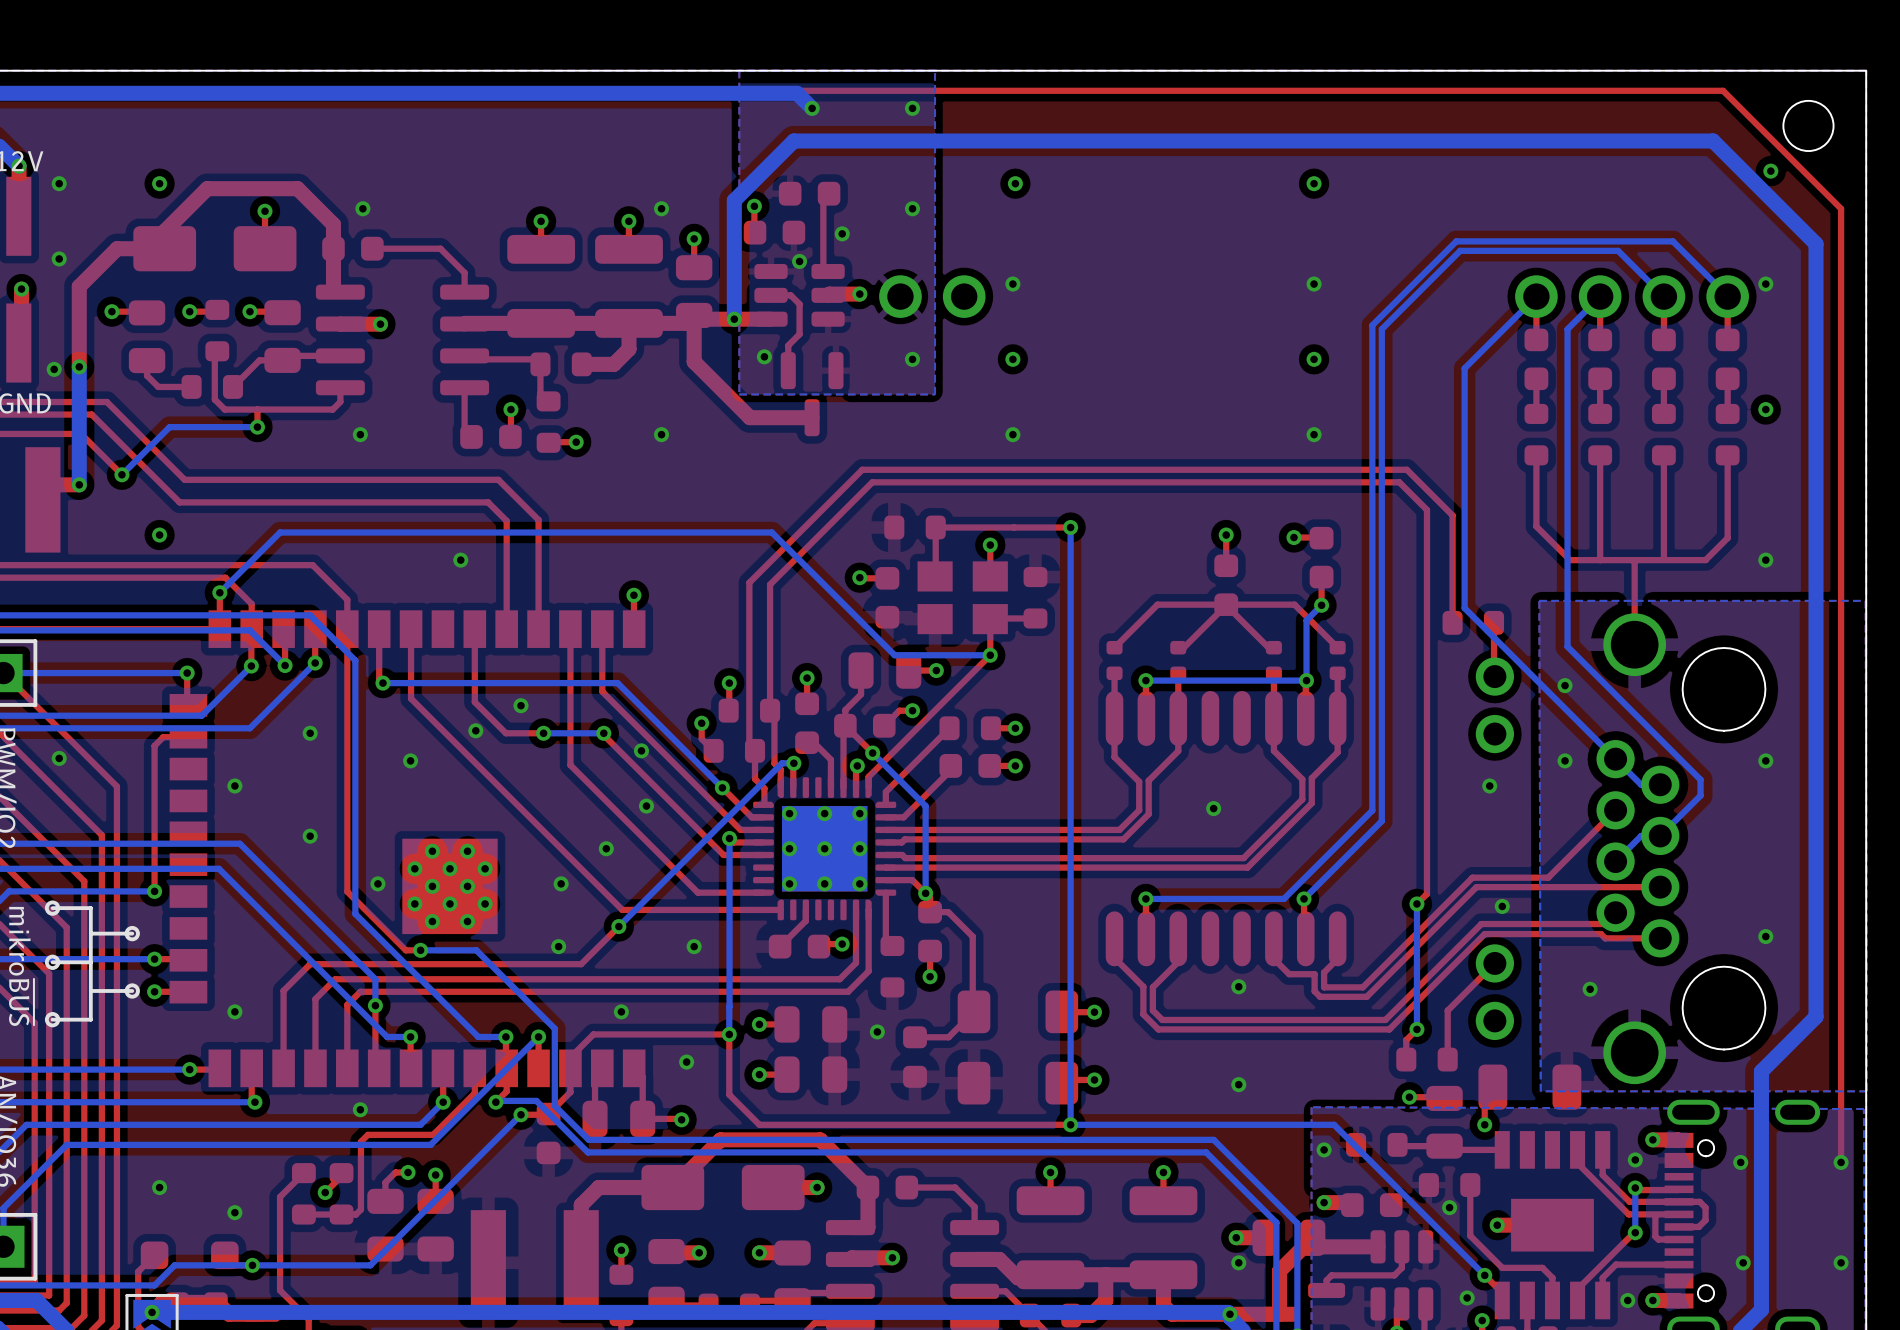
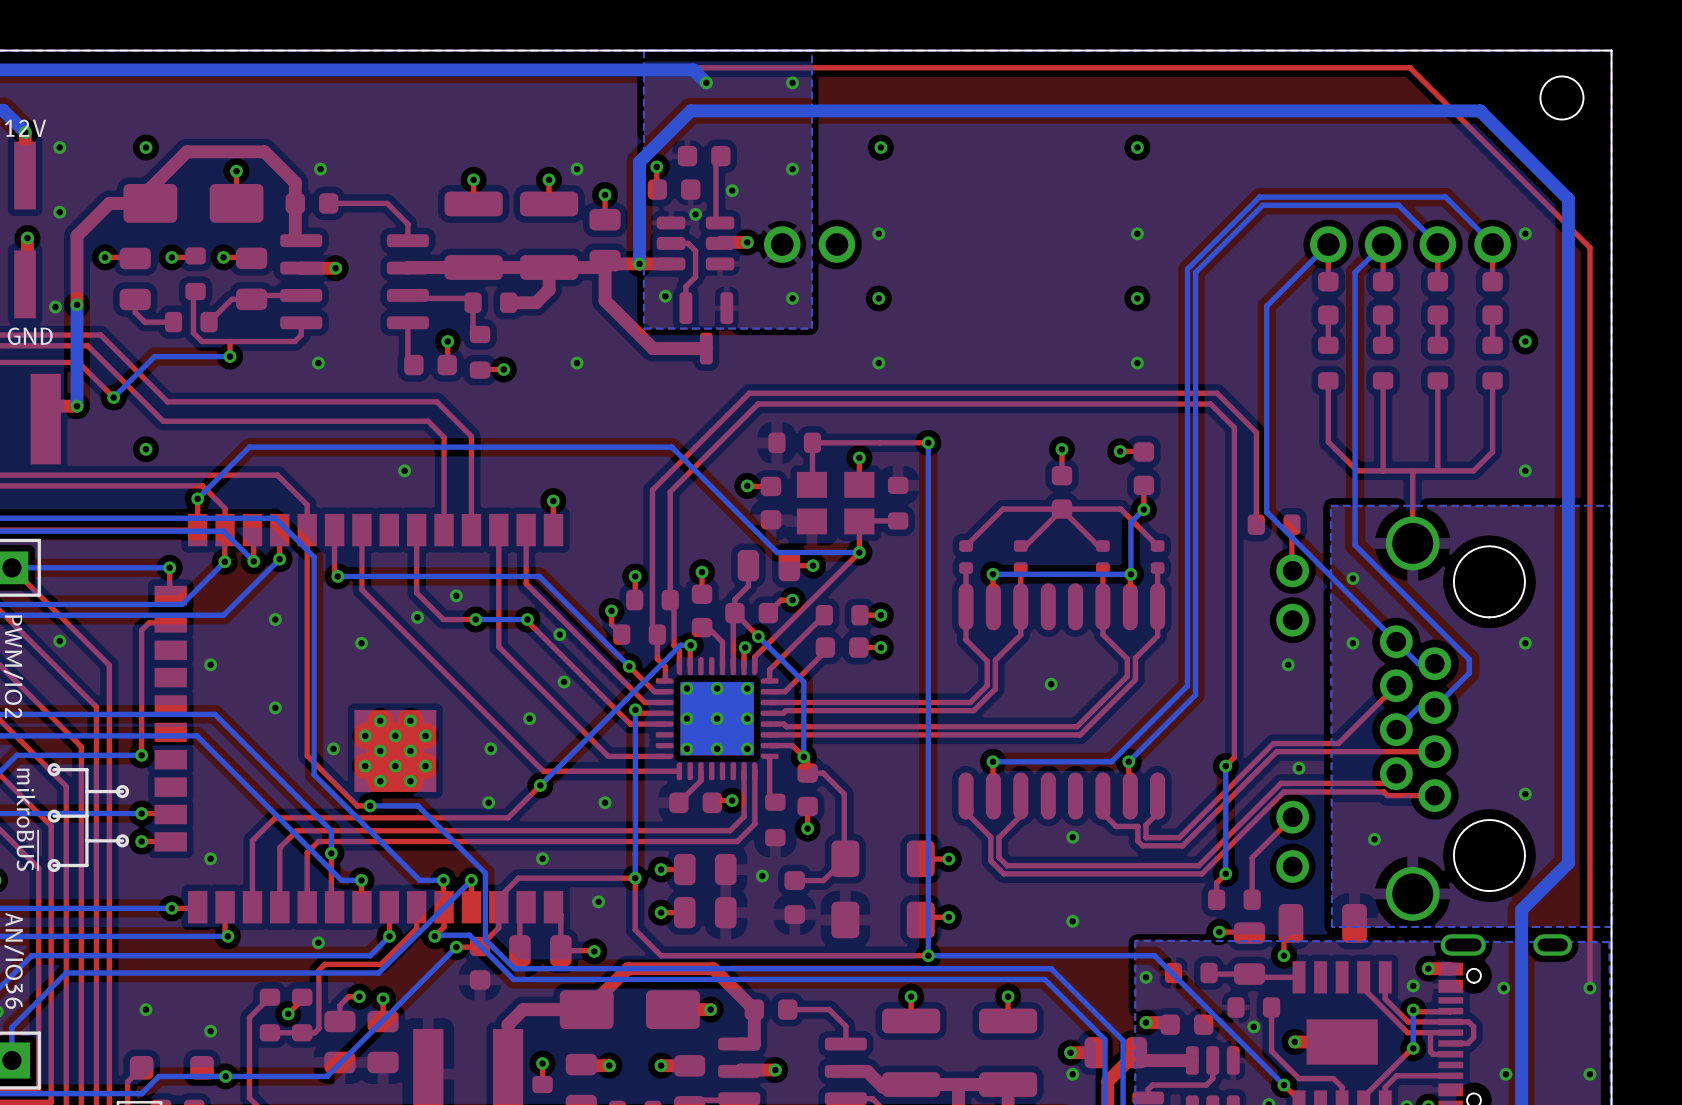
top track: (1631, 90) (1723, 90) (1841, 208) (1841, 300) -> (1410, 67) (1589, 247)
via: (1770, 171) -> none

